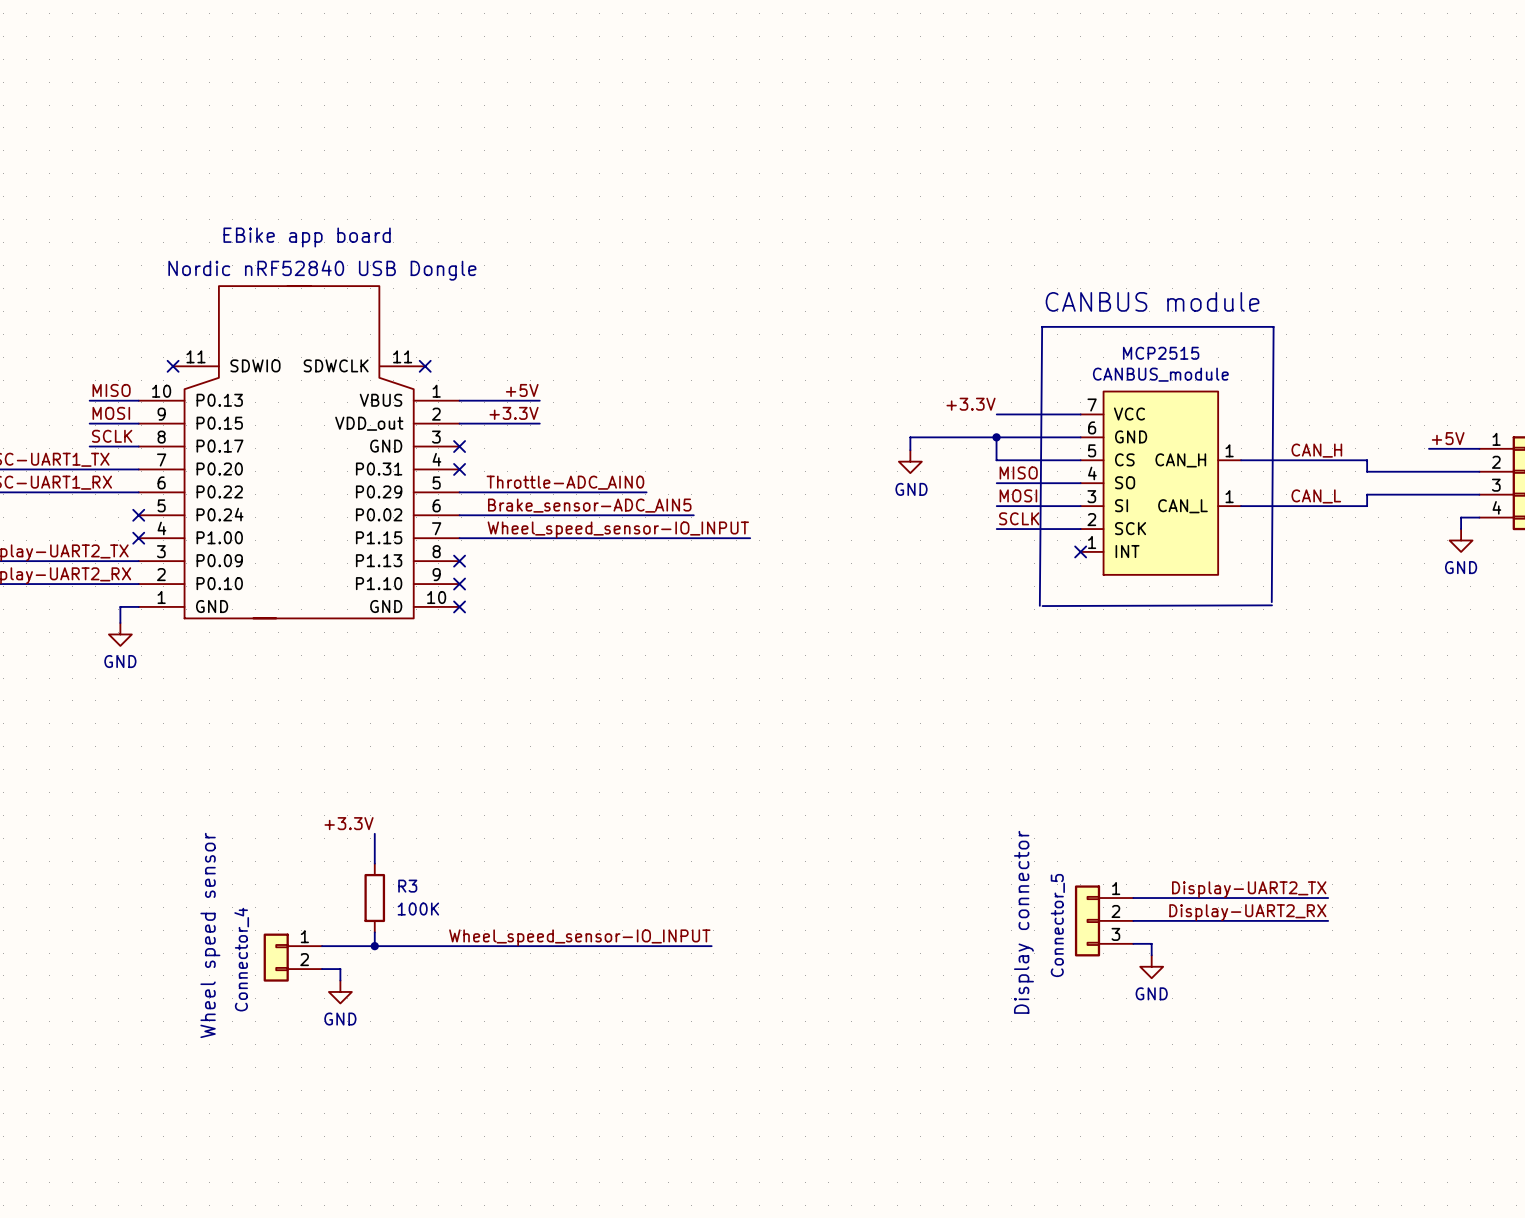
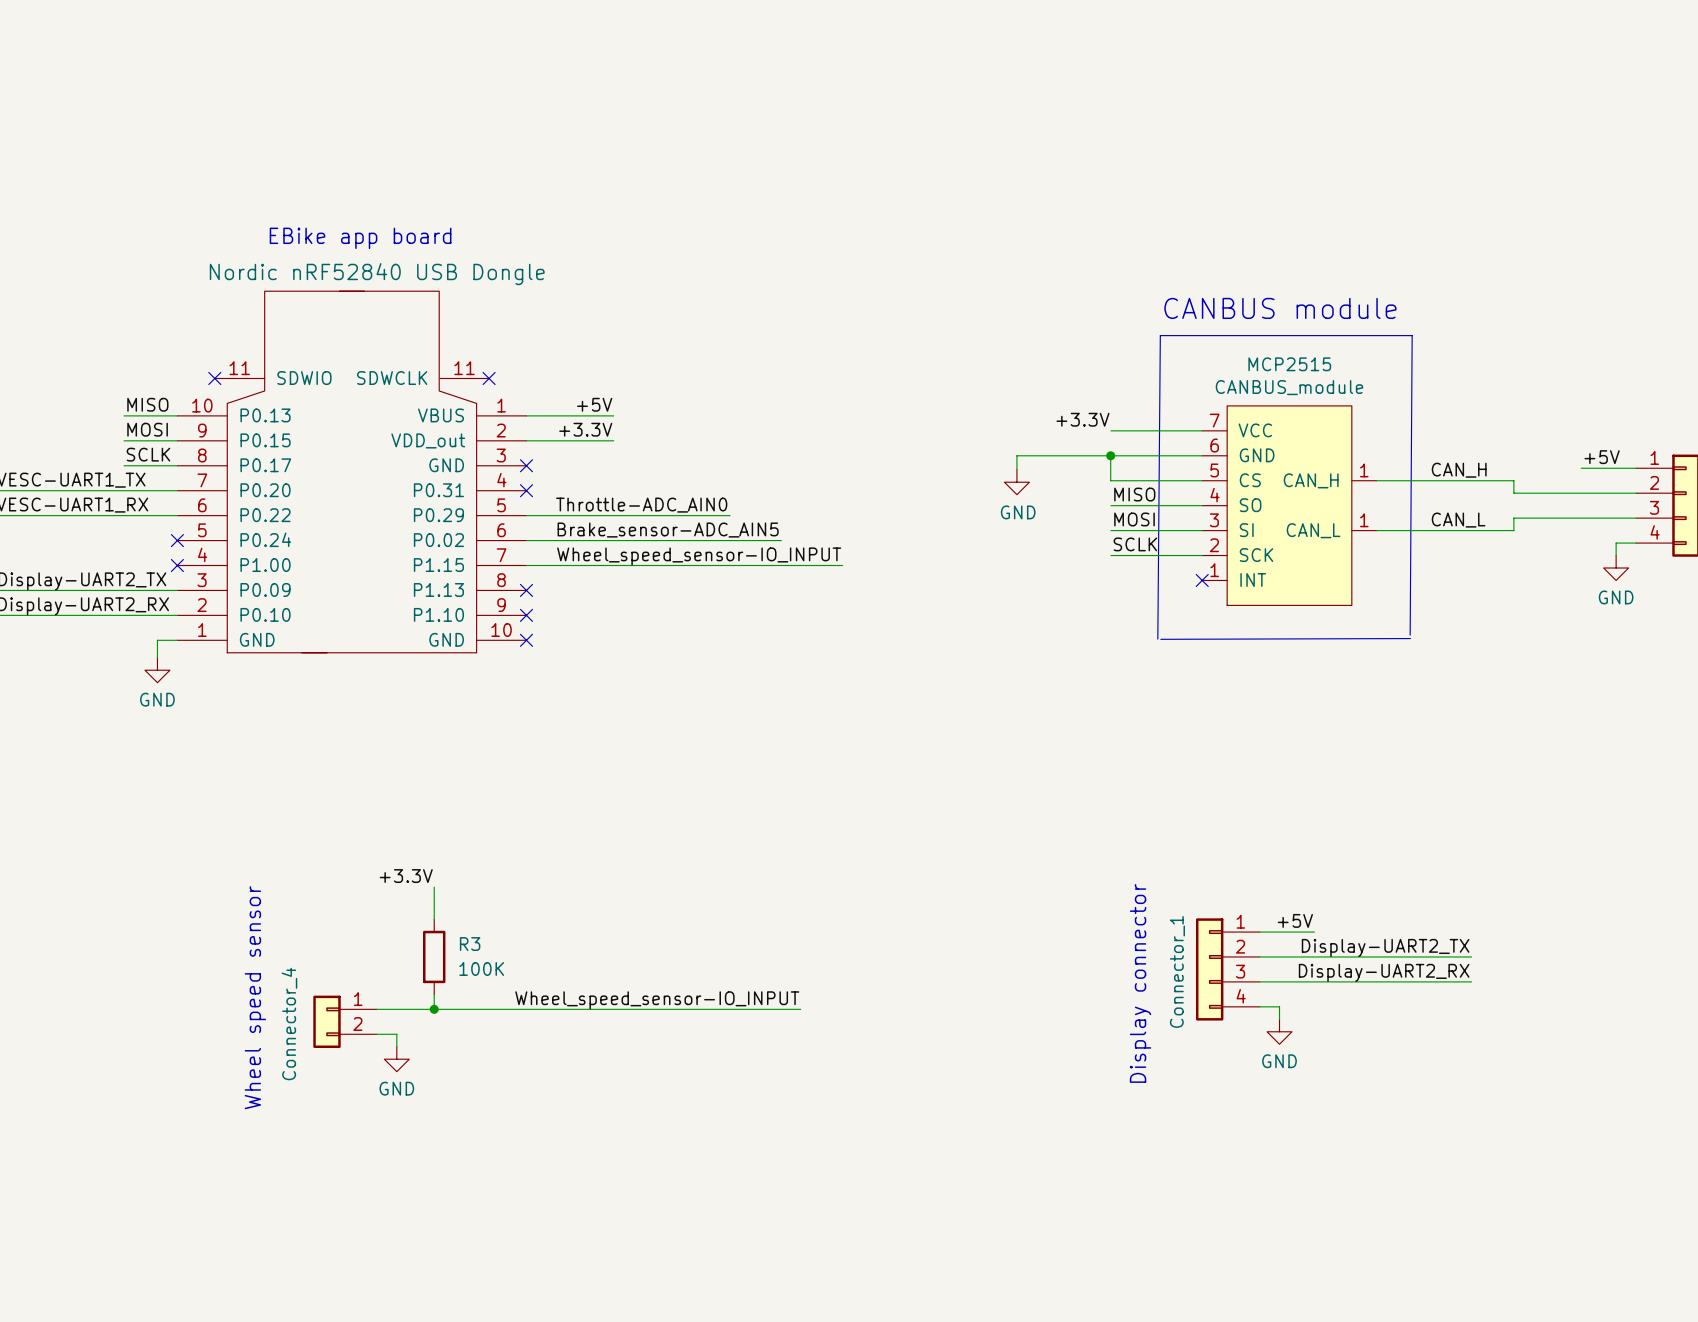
label: none -> +5V (1295, 920)
wire: none -> (1259, 932) (1314, 932)
part: none -> Connector_1 (1227, 969)
part: Connector_5 (1104, 920) -> none

